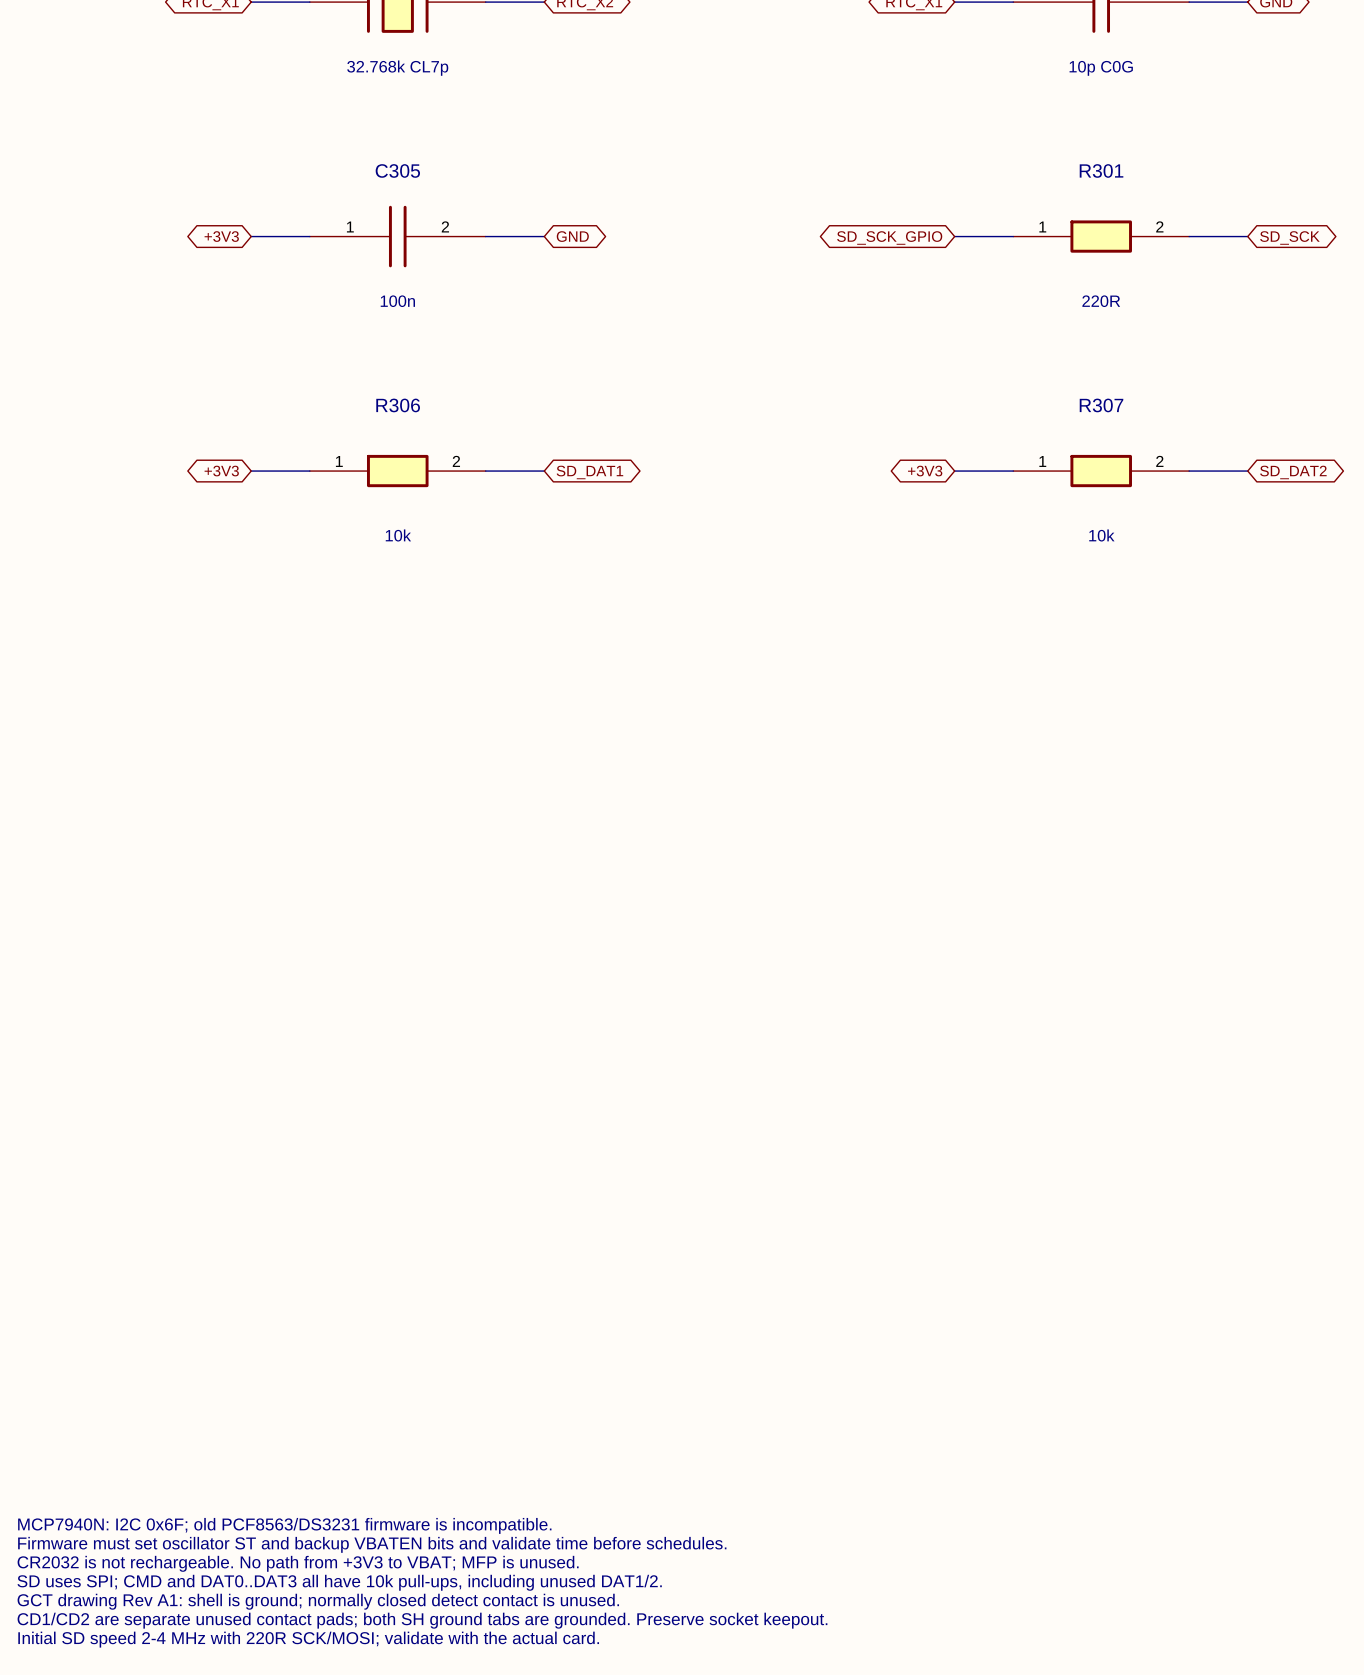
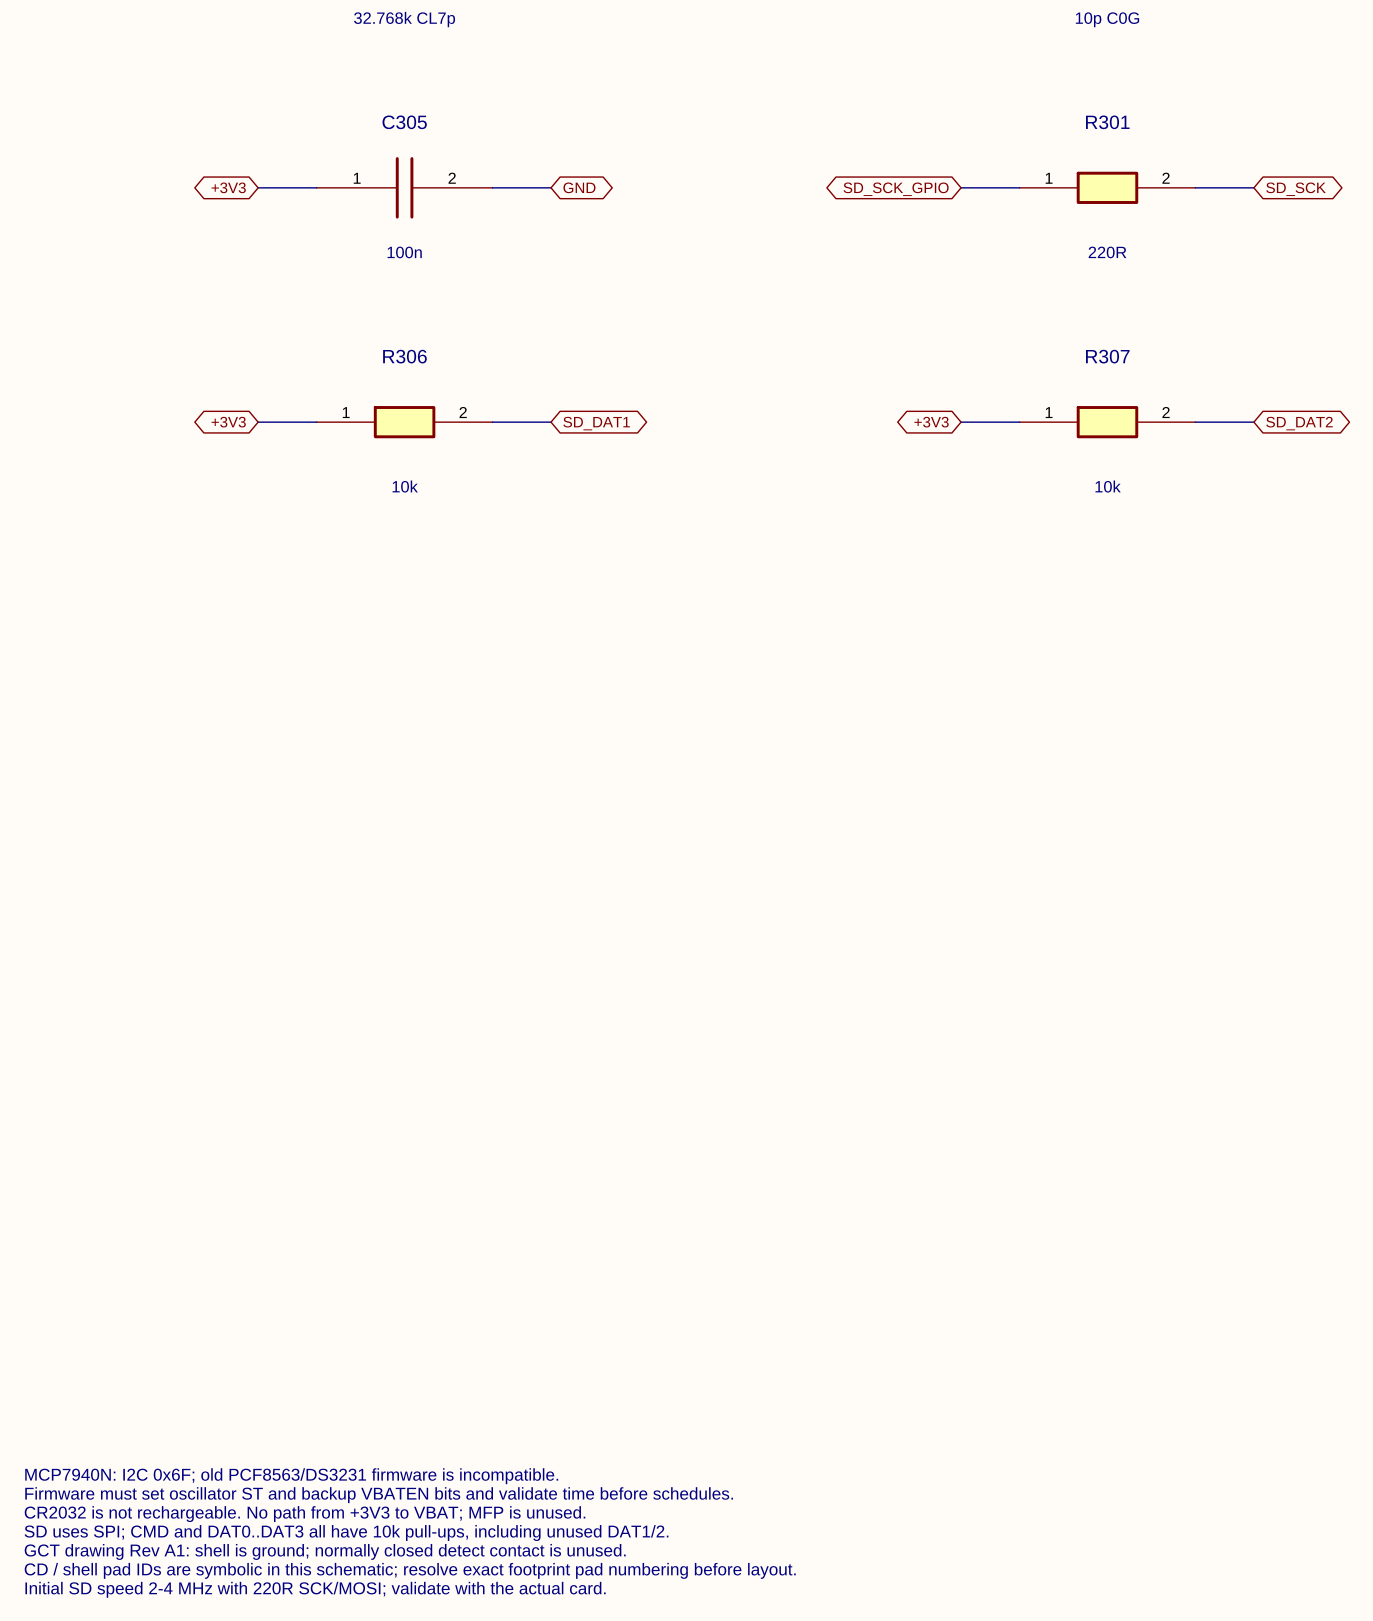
text: CD1/CD2 are separate unused contact pads; both SH ground tabs are grounded. Preserve socket keepout. (422, 1620) -> CD / shell pad IDs are symbolic in this schematic; resolve exact footprint pad numbering before layout. (410, 1570)

